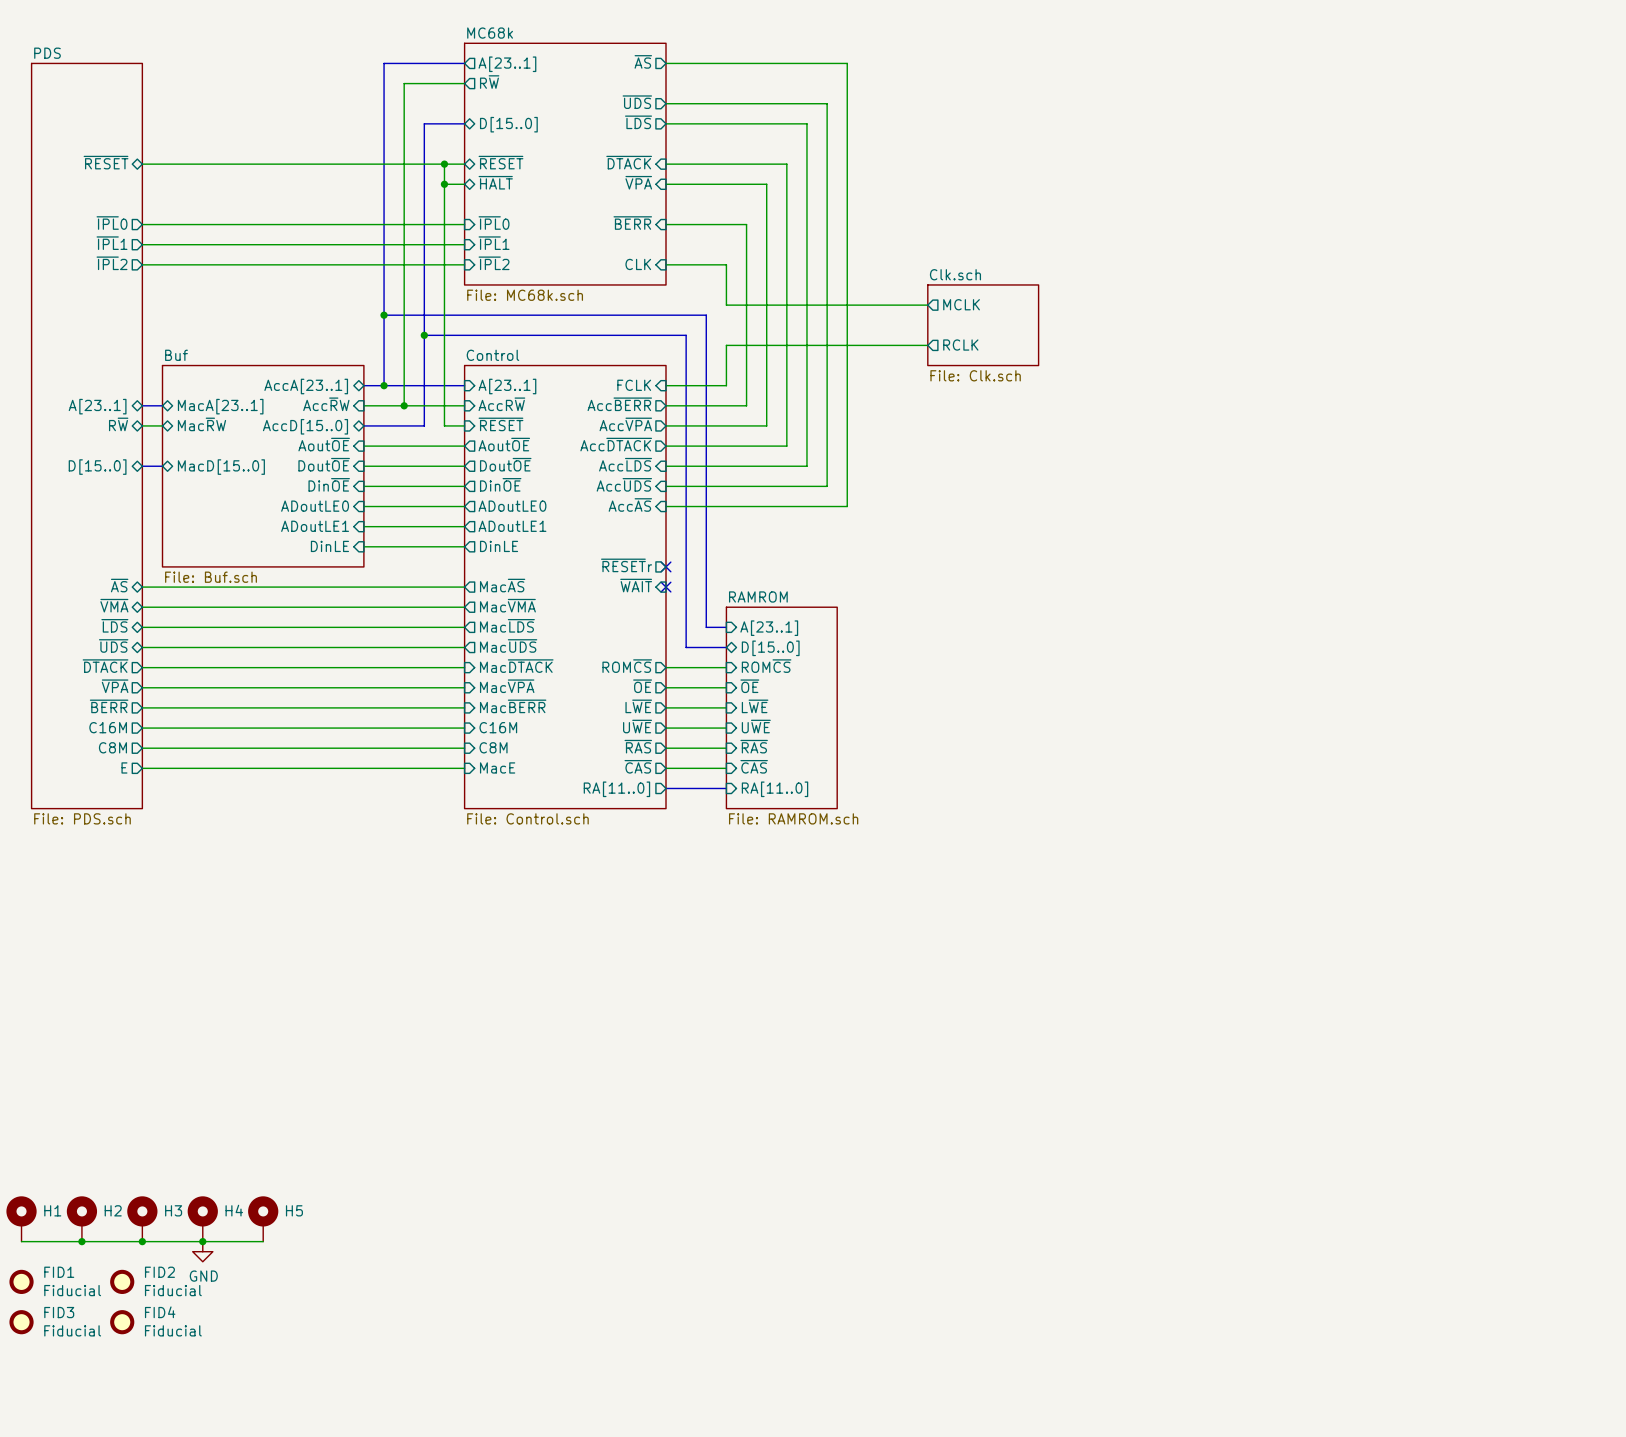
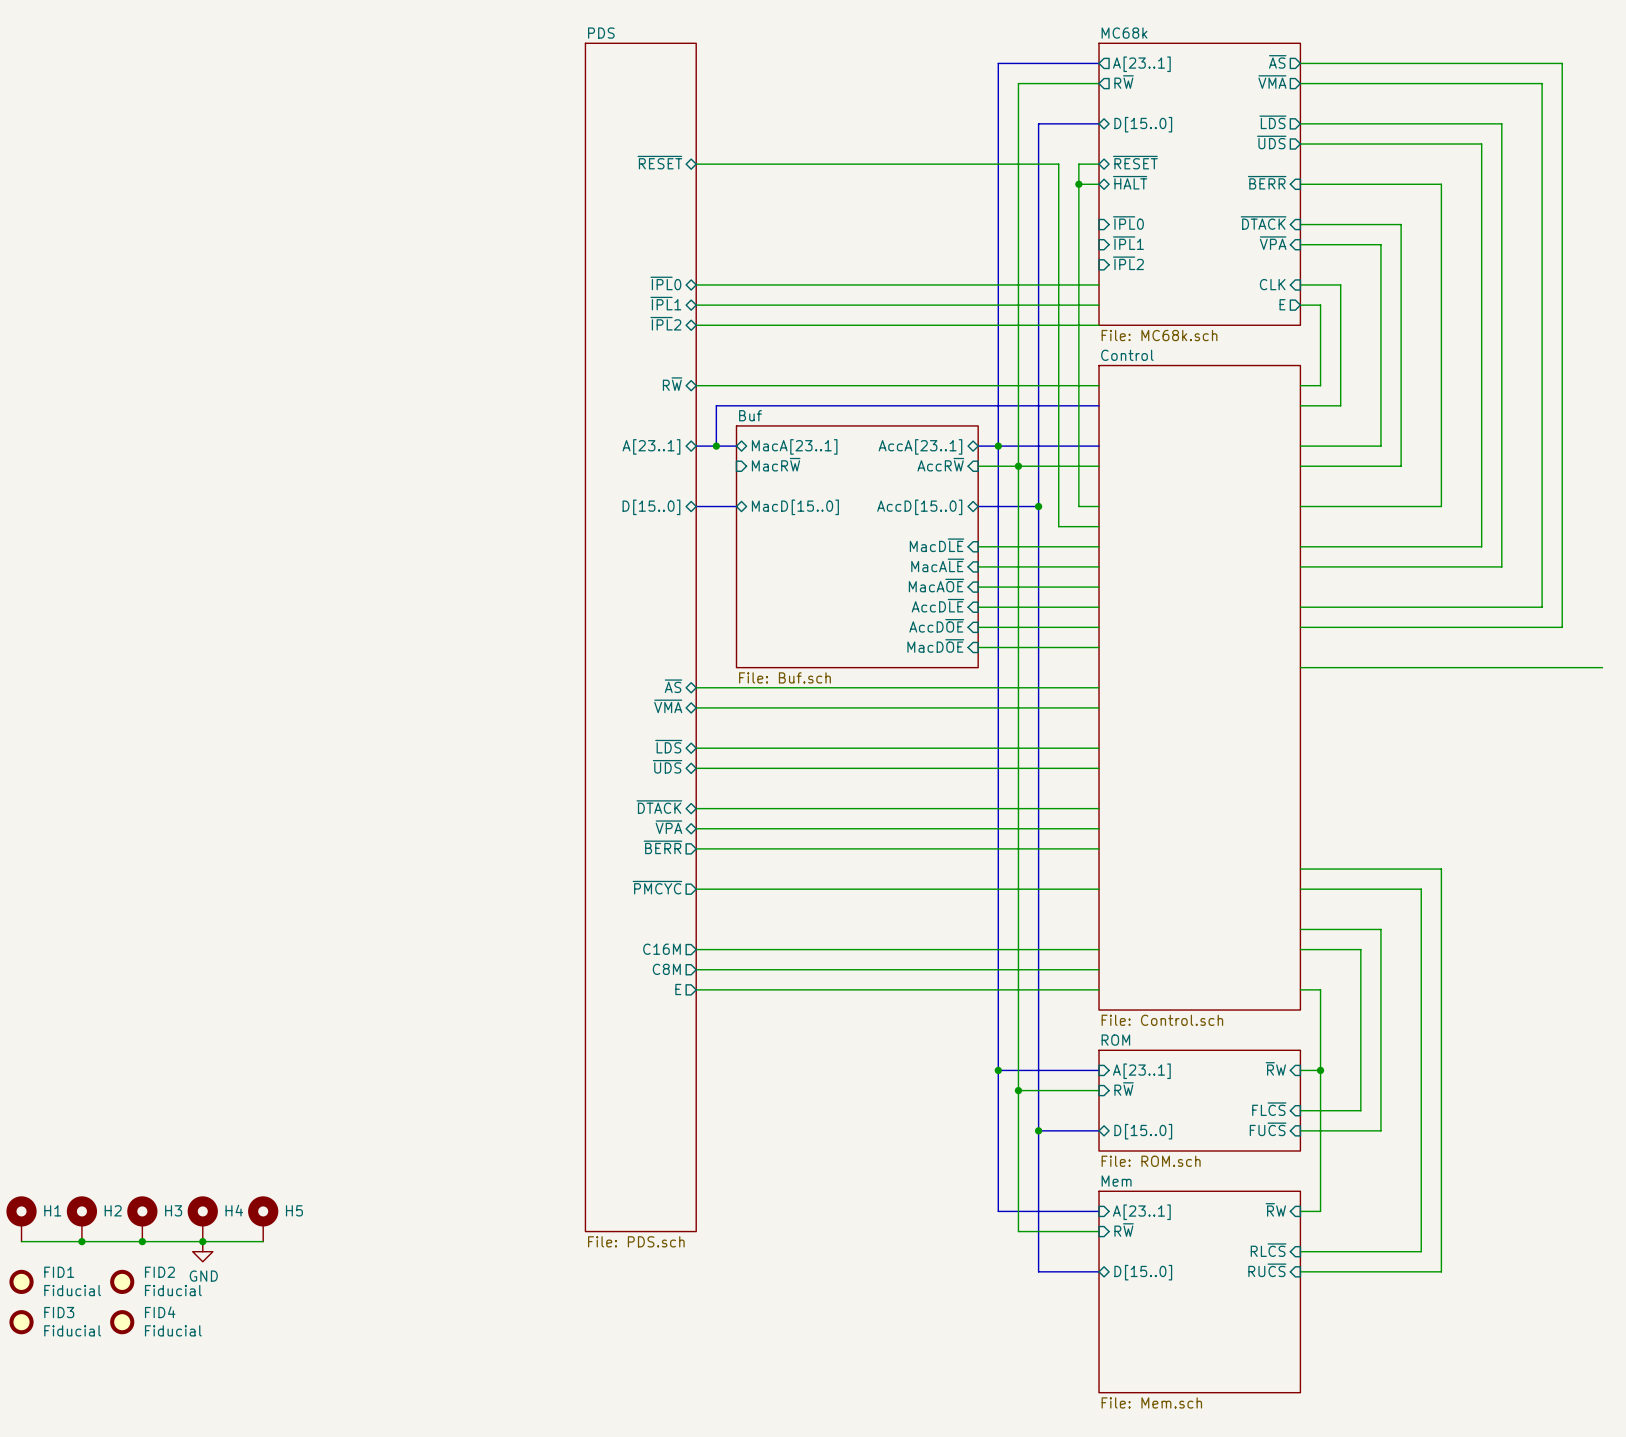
sheet MC68k name position: MC68k (490, 33) -> MC68k (1124, 33)
sheet MC68k shape: [464, 43, 667, 285] -> [1099, 43, 1301, 326]
sheet pin: ~{AS} (643, 61) -> none
sheet pin: none -> ~{AS} (1277, 61)
bus: (464, 63) (384, 63) (384, 385) -> none
wire: (666, 63) (847, 63) (847, 506) (666, 506) -> none
bus: none -> (1099, 63) (998, 63) (998, 1211) (1099, 1211)
wire: none -> (1300, 63) (1562, 63) (1562, 627) (1300, 627)
sheet pin: A[23..1] (507, 64) -> none
sheet pin: none -> A[23..1] (1141, 64)
sheet pin: R~{W} (489, 82) -> none
sheet pin: none -> R~{W} (1124, 82)
sheet pin: none -> ~{VMA} (1272, 82)
wire: (464, 83) (404, 83) (404, 405) -> none
wire: none -> (1099, 83) (1018, 83) (1018, 1231) (1099, 1231)
wire: none -> (1300, 83) (1542, 83) (1542, 607) (1300, 607)
sheet pin: ~{UDS} (637, 102) -> none
wire: (666, 103) (827, 103) (827, 486) (666, 486) -> none
sheet pin: ~{LDS} (638, 122) -> none
sheet pin: none -> ~{LDS} (1272, 122)
bus: (464, 123) (424, 123) (424, 425) (363, 425) -> none
wire: (666, 123) (806, 123) (806, 466) (666, 466) -> none
bus: none -> (1099, 123) (1038, 123) (1038, 1271) (1099, 1271)
wire: none -> (1300, 123) (1501, 123) (1501, 566) (1300, 566)
sheet pin: D[15..0] (508, 124) -> none
sheet pin: none -> D[15..0] (1143, 124)
sheet pin: none -> ~{UDS} (1271, 142)
wire: none -> (1300, 144) (1481, 144) (1481, 546) (1300, 546)
sheet pin: ~{RESET} (106, 162) -> none
sheet pin: ~{RESET} (500, 162) -> none
sheet pin: ~{DTACK} (629, 162) -> none
sheet pin: none -> ~{RESET} (659, 162)
sheet pin: none -> ~{RESET} (1135, 162)
wire: (142, 164) (464, 164) -> none
wire: (444, 164) (444, 425) (464, 425) -> none
junction: (444, 164) -> none
wire: (666, 164) (696, 164) -> none
wire: (786, 164) (786, 446) (666, 446) -> (786, 164) (1058, 164) (1058, 526) (1099, 526)
wire: none -> (1099, 164) (1078, 164) (1078, 506) (1099, 506)
sheet pin: ~{HALT} (495, 182) -> none
sheet pin: ~{VPA} (638, 182) -> none
sheet pin: none -> ~{HALT} (1130, 182)
sheet pin: none -> ~{BERR} (1267, 182)
wire: (444, 184) (464, 184) -> none
junction: (444, 184) -> none
wire: (666, 184) (766, 184) (766, 425) (666, 425) -> none
wire: none -> (1078, 184) (1099, 184)
junction: none -> (1078, 184)
wire: none -> (1300, 184) (1441, 184) (1441, 506) (1300, 506)
sheet pin: ~{IPL}0 (112, 223) -> none
sheet pin: ~{IPL}0 (494, 223) -> none
sheet pin: ~{BERR} (632, 223) -> none
sheet pin: none -> ~{IPL}0 (1128, 223)
sheet pin: none -> ~{DTACK} (1263, 223)
wire: (142, 224) (464, 224) -> none
wire: (666, 224) (746, 224) (746, 405) (666, 405) -> none
wire: none -> (1300, 224) (1401, 224) (1401, 466) (1300, 466)
sheet pin: ~{IPL}1 (112, 243) -> none
sheet pin: ~{IPL}1 (494, 243) -> none
sheet pin: none -> ~{IPL}1 (1128, 243)
sheet pin: none -> ~{VPA} (1273, 243)
wire: (142, 244) (464, 244) -> none
wire: none -> (1300, 244) (1380, 244) (1380, 446) (1300, 446)
sheet pin: ~{IPL}2 (112, 263) -> none
sheet pin: ~{IPL}2 (494, 263) -> none
sheet pin: none -> ~{IPL}2 (1128, 263)
wire: (142, 264) (464, 264) -> none
sheet pin: CLK (638, 264) -> none
wire: (666, 264) (726, 264) (726, 305) -> (696, 305) (726, 305)
sheet pin: none -> ~{IPL}0 (665, 283)
wire: none -> (696, 284) (1099, 284)
sheet pin: none -> CLK (1272, 284)
wire: none -> (1300, 284) (1340, 284) (1340, 405) (1300, 405)
sheet MC68k value position: File: MC68k.sch (525, 295) -> File: MC68k.sch (1159, 335)
sheet pin: none -> ~{IPL}1 (665, 303)
sheet pin: MCLK (961, 304) -> none
sheet pin: none -> E (1282, 304)
wire: none -> (927, 305) (1099, 305)
wire: none -> (1300, 305) (1320, 305) (1320, 385) (1300, 385)
bus: (384, 315) (706, 315) (706, 627) (726, 627) -> none
junction: (384, 315) -> none
sheet pin: none -> ~{IPL}2 (665, 323)
wire: none -> (696, 325) (1099, 325)
sheet Clk.sch: File: Clk.sch (983, 325) -> none
bus: (424, 335) (686, 335) (686, 647) (726, 647) -> none
junction: (424, 335) -> none
wire: (927, 345) (726, 345) (726, 385) -> (1099, 385) (726, 385)
sheet pin: RCLK (960, 345) -> none
sheet pin: none -> R~{W} (672, 384)
bus: (363, 385) (464, 385) -> none
junction: (384, 385) -> none
sheet pin: FCLK (634, 385) -> none
wire: (666, 385) (696, 385) -> none
sheet pin: AccA[23..1] (306, 386) -> none
sheet pin: A[23..1] (507, 386) -> none
sheet pin: Acc~{R}W (326, 404) -> none
sheet pin: AccR~{W} (501, 404) -> none
sheet pin: Acc~{BERR} (619, 404) -> none
bus: (142, 405) (162, 405) -> none
wire: (363, 405) (464, 405) -> none
junction: (404, 405) -> none
bus: none -> (1099, 405) (716, 405) (716, 446)
sheet pin: A[23..1] (97, 406) -> none
sheet pin: MacA[23..1] (220, 406) -> none
sheet pin: R~{W} (118, 424) -> none
sheet pin: Mac~{R}W (201, 424) -> none
sheet pin: ~{RESET} (500, 424) -> none
sheet pin: Acc~{VPA} (625, 424) -> none
wire: (142, 425) (162, 425) -> none
sheet pin: AccD[15..0] (305, 426) -> none
sheet PDS: File: PDS.sch (86, 436) -> none
sheet pin: Aout~{OE} (324, 444) -> none
sheet pin: Aout~{OE} (504, 444) -> none
sheet pin: Acc~{DTACK} (616, 444) -> none
wire: (363, 446) (464, 446) -> none
sheet pin: none -> A[23..1] (651, 446)
bus: none -> (696, 446) (736, 446)
junction: none -> (716, 446)
sheet pin: none -> MacA[23..1] (794, 446)
sheet pin: none -> AccA[23..1] (920, 446)
bus: none -> (978, 446) (1099, 446)
junction: none -> (998, 446)
sheet pin: Dout~{OE} (324, 464) -> none
sheet pin: Dout~{OE} (505, 464) -> none
sheet pin: Acc~{LDS} (625, 464) -> none
sheet pin: none -> MacR~{W} (776, 464)
sheet pin: none -> AccR~{W} (940, 464)
bus: (142, 466) (162, 466) -> none
sheet Buf: File: Buf.sch (263, 466) -> none
wire: (363, 466) (464, 466) -> none
wire: none -> (978, 466) (1099, 466)
junction: none -> (1018, 466)
sheet pin: D[15..0] (97, 467) -> none
sheet pin: MacD[15..0] (221, 467) -> none
sheet pin: Din~{OE} (329, 484) -> none
sheet pin: Din~{OE} (500, 484) -> none
sheet pin: Acc~{UDS} (624, 484) -> none
wire: (363, 486) (464, 486) -> none
sheet pin: Acc~{AS} (630, 504) -> none
sheet pin: ADoutLE0 (315, 506) -> none
wire: (363, 506) (464, 506) -> none
sheet pin: ADoutLE0 (512, 506) -> none
bus: none -> (696, 506) (736, 506)
bus: none -> (978, 506) (1038, 506)
junction: none -> (1038, 506)
sheet pin: none -> MacD[15..0] (795, 507)
sheet pin: none -> AccD[15..0] (919, 507)
sheet pin: ADoutLE1 (315, 526) -> none
wire: (363, 526) (464, 526) -> none
sheet pin: ADoutLE1 (512, 526) -> none
sheet pin: none -> MacD~{LE} (936, 545)
sheet pin: DinLE (329, 546) -> none
wire: (363, 546) (464, 546) -> none
sheet pin: DinLE (499, 546) -> none
sheet Buf: none -> File: Buf.sch (857, 546)
wire: none -> (978, 546) (1099, 546)
sheet pin: ~{RESET}r (626, 565) -> none
sheet pin: none -> MacA~{LE} (937, 565)
no-connect mark: (666, 566) -> none
wire: none -> (978, 566) (1099, 566)
sheet pin: ~{AS} (119, 585) -> none
sheet pin: Mac~{AS} (502, 585) -> none
sheet pin: ~{WAIT} (636, 585) -> none
sheet pin: none -> MacA~{OE} (936, 585)
wire: (142, 587) (464, 587) -> none
sheet Control: File: Control.sch (565, 587) -> none
no-connect mark: (666, 587) -> none
wire: none -> (978, 587) (1099, 587)
sheet pin: ~{VMA} (114, 605) -> none
sheet pin: Mac~{VMA} (507, 605) -> none
sheet pin: none -> AccD~{LE} (937, 605)
wire: (142, 607) (464, 607) -> none
wire: none -> (978, 607) (1099, 607)
sheet pin: ~{LDS} (114, 625) -> none
sheet pin: Mac~{LDS} (507, 625) -> none
sheet pin: none -> AccD~{OE} (936, 625)
wire: (142, 627) (464, 627) -> none
wire: none -> (978, 627) (1099, 627)
sheet pin: A[23..1] (769, 628) -> none
sheet PDS: none -> File: PDS.sch (640, 637)
sheet pin: ~{UDS} (113, 645) -> none
sheet pin: Mac~{UDS} (508, 645) -> none
sheet pin: none -> MacD~{OE} (935, 645)
wire: (142, 647) (464, 647) -> none
wire: none -> (978, 647) (1099, 647)
sheet pin rotation: 0° (770, 648) -> 180° (651, 507)
sheet pin position: D[15..0] (770, 648) -> D[15..0] (651, 507)
sheet pin: ~{DTACK} (105, 666) -> none
sheet pin: Mac~{DTACK} (516, 666) -> none
sheet pin shape: output (627, 666) -> bidirectional (673, 686)
sheet pin: ROM~{CS} (627, 666) -> ~{AS} (673, 686)
sheet pin: ROM~{CS} (766, 666) -> none
wire: (142, 667) (464, 667) -> none
wire: (666, 667) (726, 667) -> none
wire: none -> (1300, 667) (1602, 667)
sheet pin: ~{VPA} (115, 686) -> none
sheet pin: Mac~{VPA} (507, 686) -> none
sheet pin: ~{OE} (642, 686) -> none
sheet pin: ~{OE} (749, 686) -> none
wire: (142, 687) (464, 687) -> none
wire: (666, 687) (696, 687) -> none
wire: none -> (726, 687) (1099, 687)
sheet Control: none -> File: Control.sch (1199, 687)
sheet pin: ~{BERR} (109, 706) -> none
sheet pin: Mac~{BERR} (513, 706) -> none
sheet pin: L~{WE} (638, 706) -> none
sheet pin: none -> ~{VMA} (668, 706)
sheet pin: L~{WE} (755, 706) -> none
wire: (142, 707) (464, 707) -> none
wire: (666, 707) (696, 707) -> none
wire: none -> (726, 707) (1099, 707)
sheet RAMROM: File: RAMROM.sch (781, 707) -> none
sheet pin: U~{WE} (637, 726) -> none
sheet pin: U~{WE} (756, 726) -> none
sheet pin: C16M (108, 727) -> none
sheet pin: C16M (498, 727) -> none
wire: (142, 728) (464, 728) -> none
wire: (666, 728) (726, 728) -> none
sheet pin: ~{RAS} (638, 746) -> none
sheet pin: none -> ~{LDS} (668, 746)
sheet pin: ~{RAS} (754, 746) -> none
sheet pin: C8M (112, 747) -> none
sheet pin: C8M (493, 747) -> none
wire: (142, 748) (464, 748) -> none
wire: (666, 748) (696, 748) -> none
wire: none -> (726, 748) (1099, 748)
sheet pin: ~{CAS} (638, 766) -> none
sheet pin: none -> ~{UDS} (667, 766)
sheet pin: ~{CAS} (754, 766) -> none
sheet pin: E (124, 767) -> none
sheet pin: MacE (497, 767) -> none
wire: (142, 768) (464, 768) -> none
wire: (666, 768) (696, 768) -> none
wire: none -> (726, 768) (1099, 768)
bus: (666, 788) (726, 788) -> none
sheet pin: RA[11..0] (616, 789) -> none
sheet pin: RA[11..0] (775, 789) -> none
sheet pin: none -> ~{DTACK} (659, 807)
wire: none -> (696, 808) (1099, 808)
sheet pin: none -> ~{VPA} (668, 827)
wire: none -> (696, 828) (1099, 828)
sheet pin: none -> ~{BERR} (662, 847)
wire: none -> (696, 848) (1099, 848)
wire: none -> (1300, 869) (1441, 869) (1441, 1271) (1300, 1271)
sheet pin: none -> ~{PMCYC} (657, 887)
wire: none -> (696, 889) (1099, 889)
wire: none -> (1300, 889) (1421, 889) (1421, 1251) (1300, 1251)
wire: none -> (1300, 929) (1380, 929) (1380, 1130) (1300, 1130)
sheet pin: none -> C16M (662, 949)
wire: none -> (696, 949) (1099, 949)
wire: none -> (1300, 949) (1360, 949) (1360, 1110) (1300, 1110)
sheet pin: none -> C8M (666, 969)
wire: none -> (696, 969) (1099, 969)
sheet pin: none -> E (678, 989)
wire: none -> (696, 989) (1099, 989)
wire: none -> (1300, 989) (1320, 989) (1320, 1211) (1300, 1211)
sheet pin: none -> ~{R}W (1275, 1068)
bus: none -> (998, 1070) (1099, 1070)
junction: none -> (998, 1070)
wire: none -> (1300, 1070) (1320, 1070)
junction: none -> (1320, 1070)
sheet pin: none -> A[23..1] (1141, 1071)
sheet pin: none -> R~{W} (1124, 1089)
wire: none -> (1018, 1090) (1099, 1090)
junction: none -> (1018, 1090)
sheet ROM: none -> File: ROM.sch (1199, 1100)
sheet pin: none -> FL~{CS} (1269, 1109)
sheet pin: none -> FU~{CS} (1268, 1129)
bus: none -> (1038, 1130) (1099, 1130)
junction: none -> (1038, 1130)
sheet pin: none -> D[15..0] (1143, 1131)
sheet pin: none -> ~{R}W (1275, 1209)
sheet pin: none -> A[23..1] (1141, 1212)
sheet pin: none -> R~{W} (1124, 1230)
sheet pin: none -> RL~{CS} (1268, 1250)
sheet pin: none -> RU~{CS} (1267, 1270)
sheet pin: none -> D[15..0] (1143, 1272)
sheet Mem: none -> File: Mem.sch (1199, 1291)

